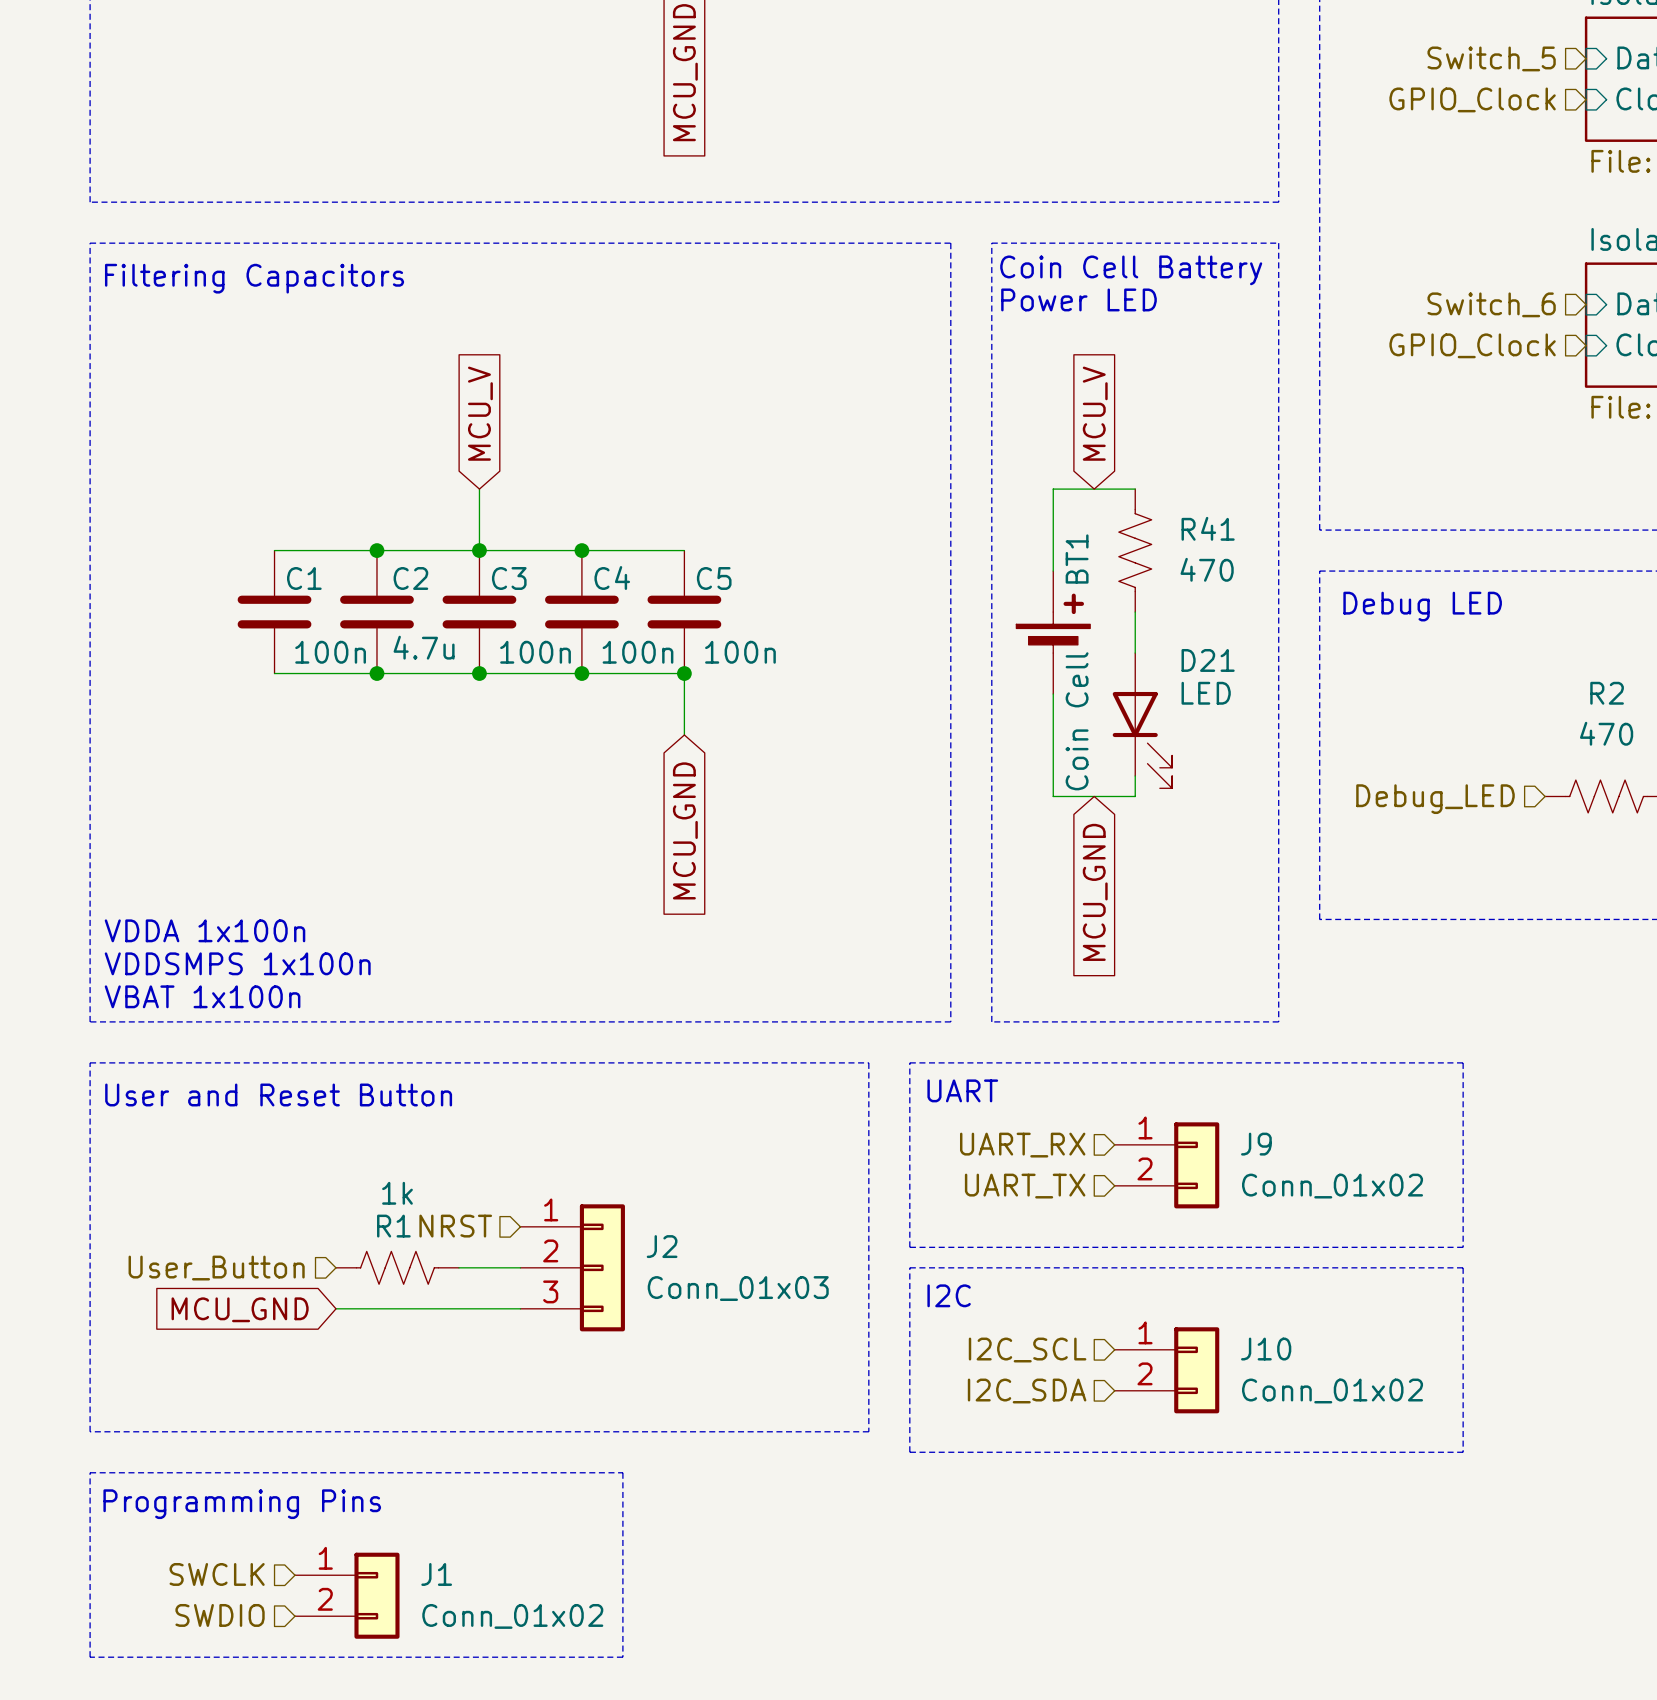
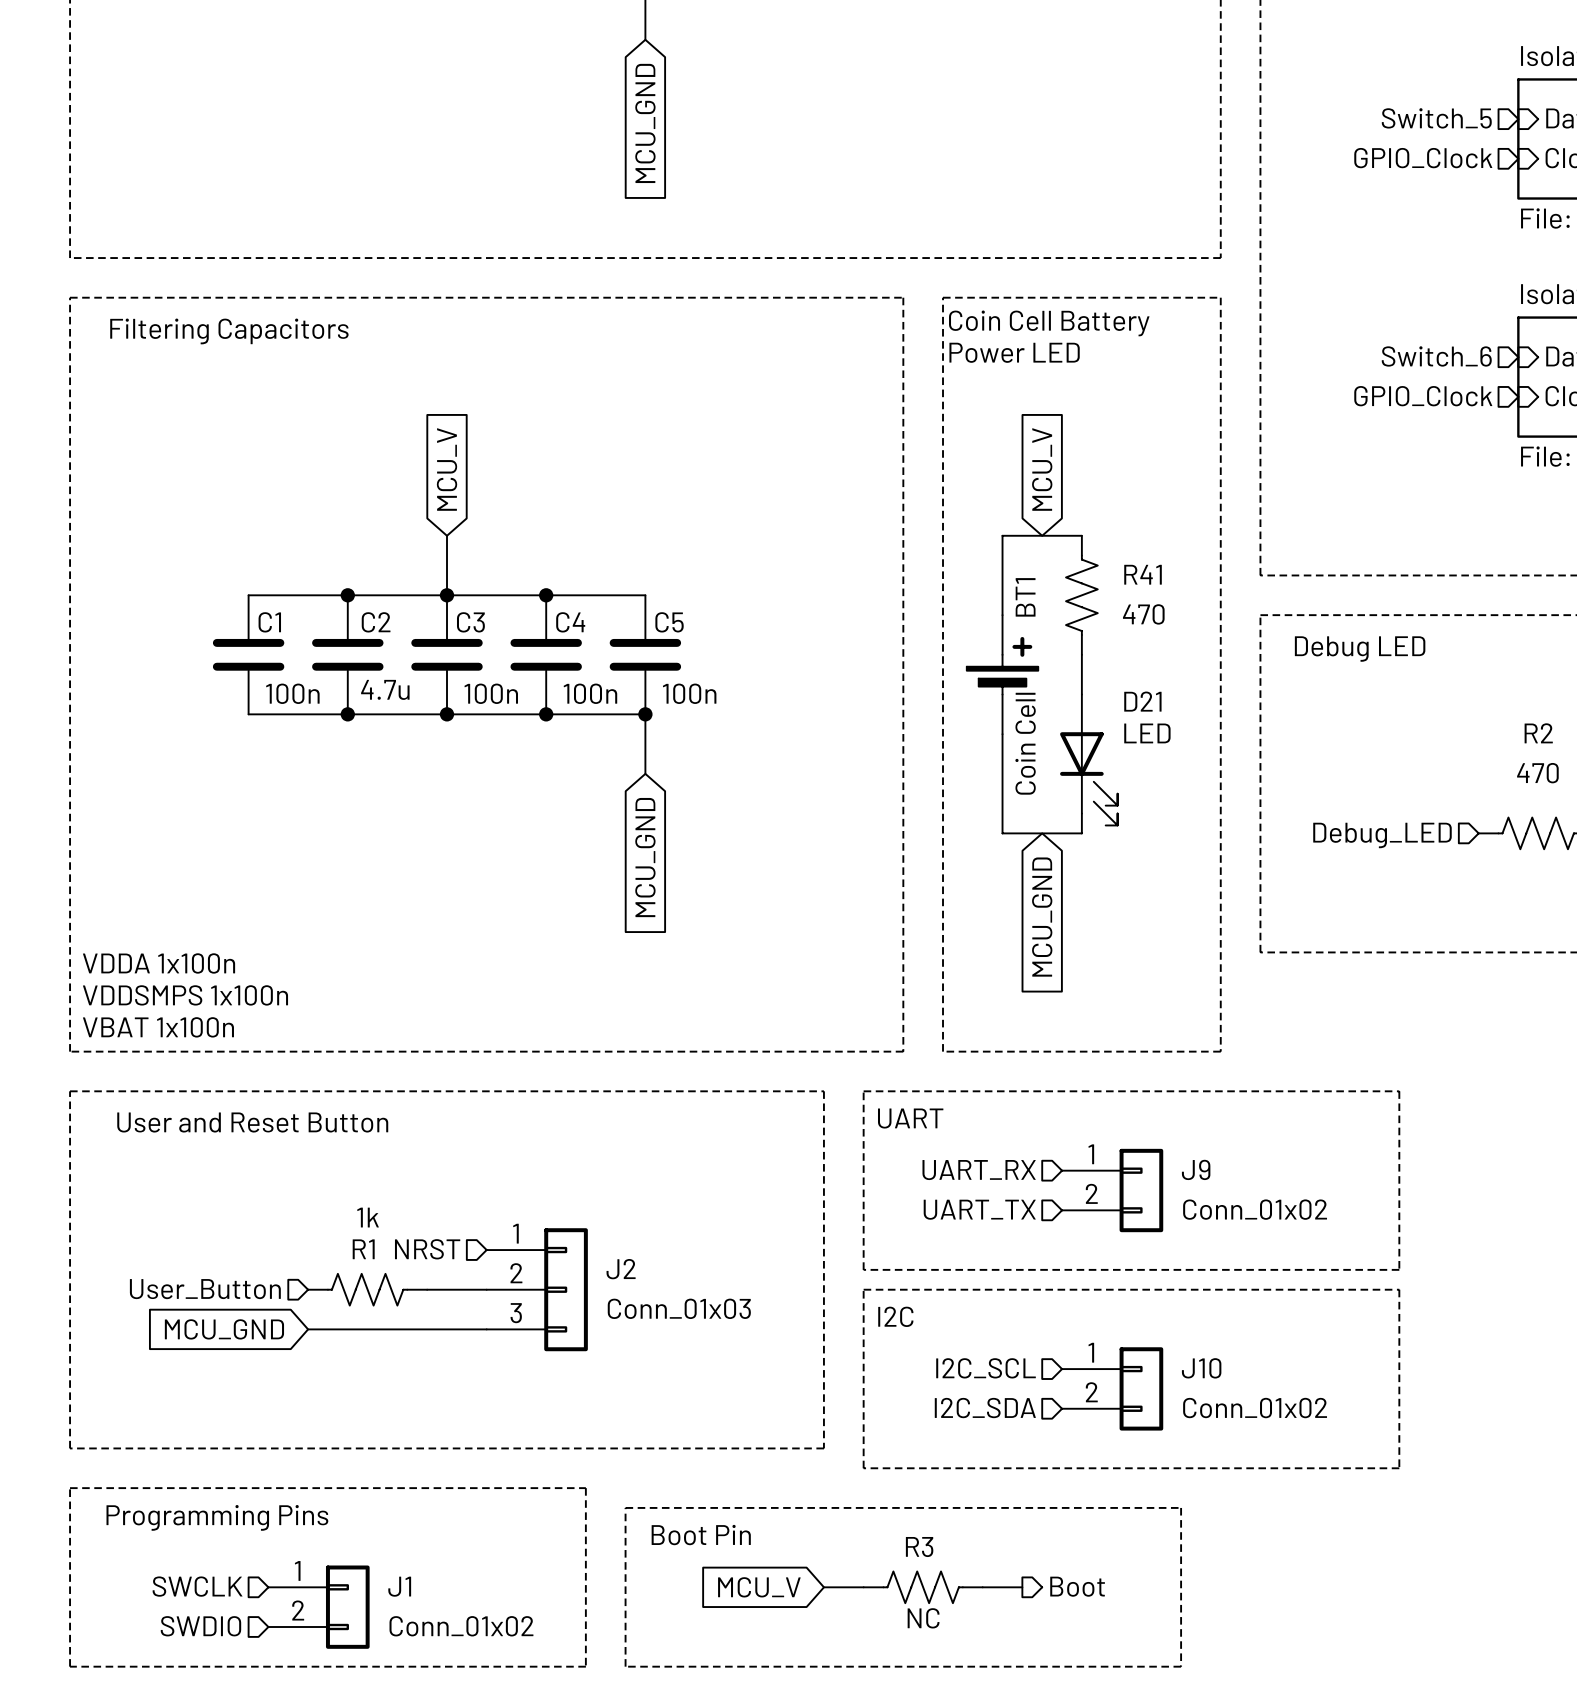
line: none -> (625, 1507) (1181, 1507) (1181, 1666) (625, 1666) (625, 1507)
text: none -> Boot Pin (701, 1535)
hierarchical label: none -> Boot (1077, 1586)
wire: none -> (823, 1587) (863, 1587)
R3: none -> NC (923, 1587)
wire: none -> (982, 1587) (1022, 1587)
global label: none -> MCU_V (759, 1587)

